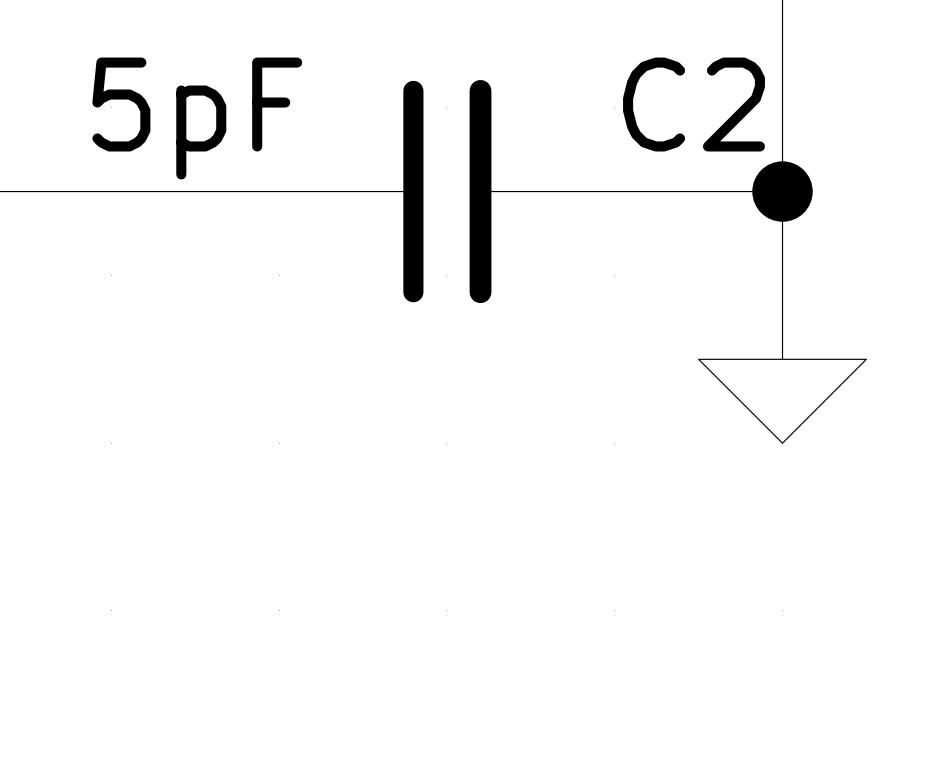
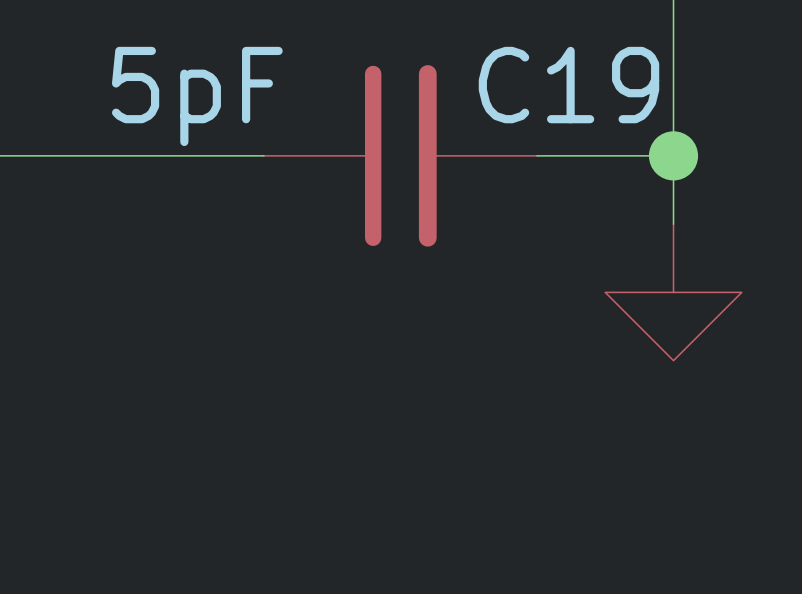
C2 name: C2 (694, 104) -> C19 (568, 85)

